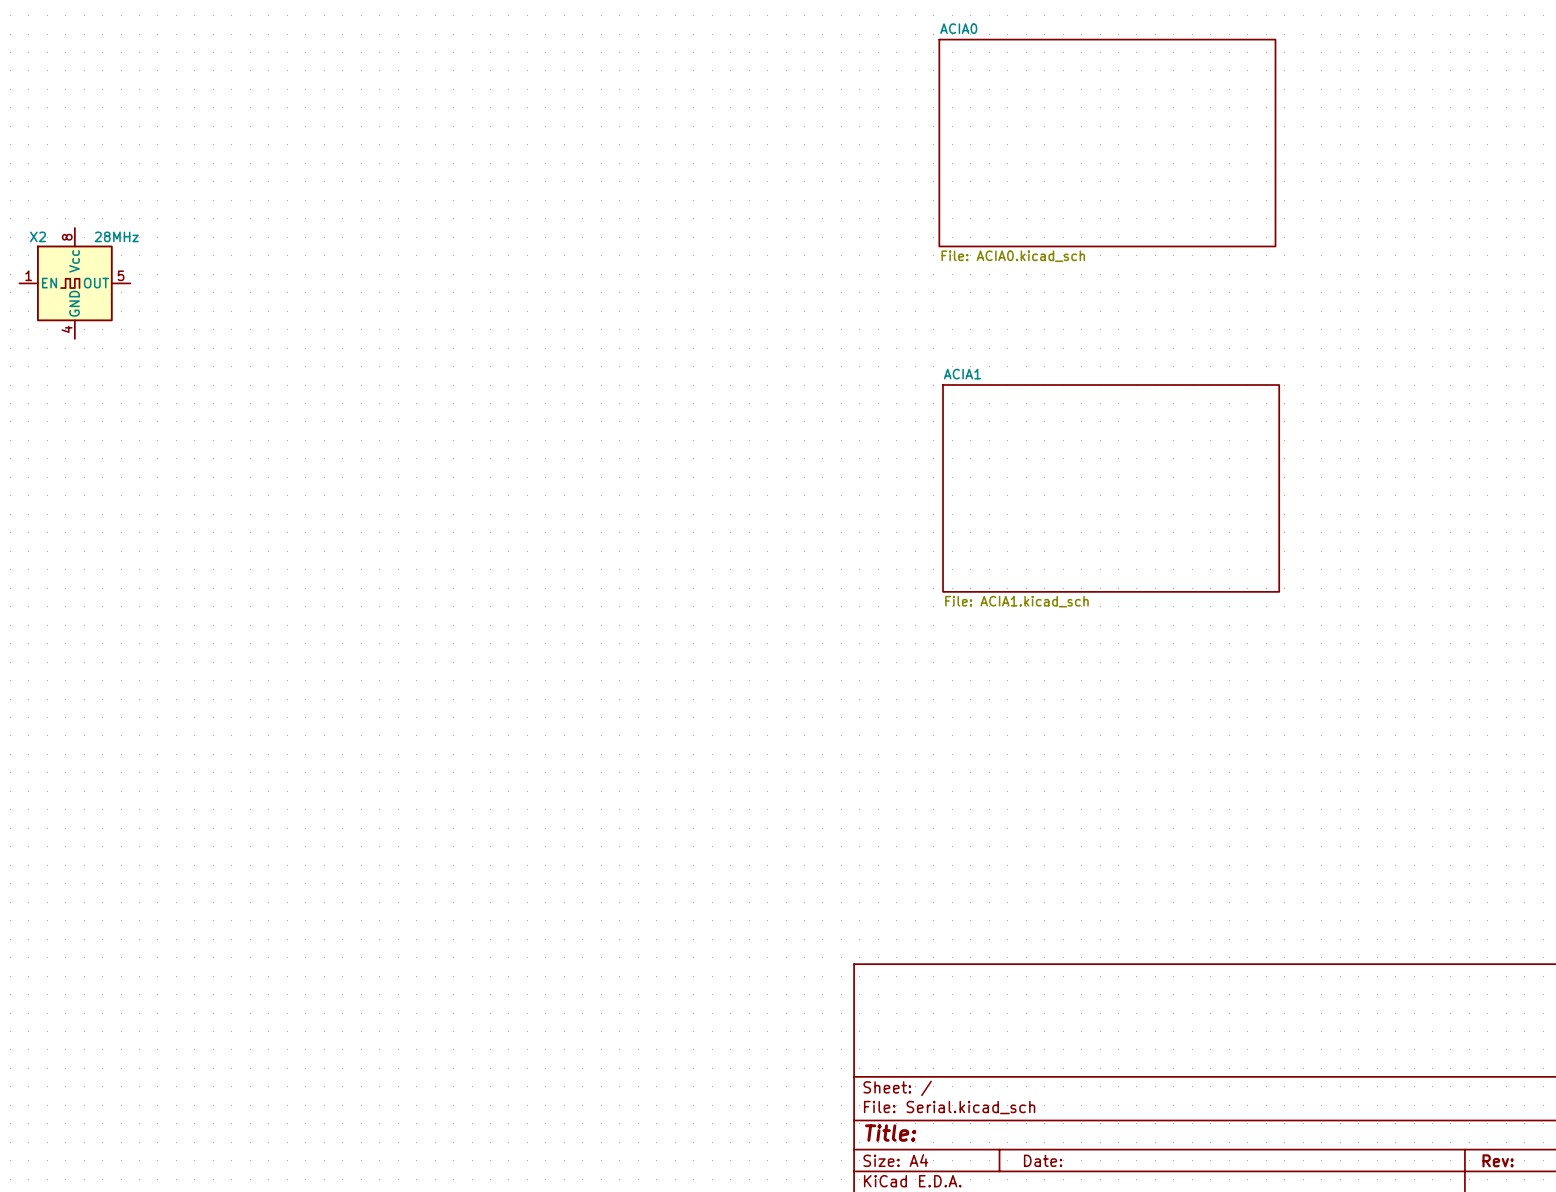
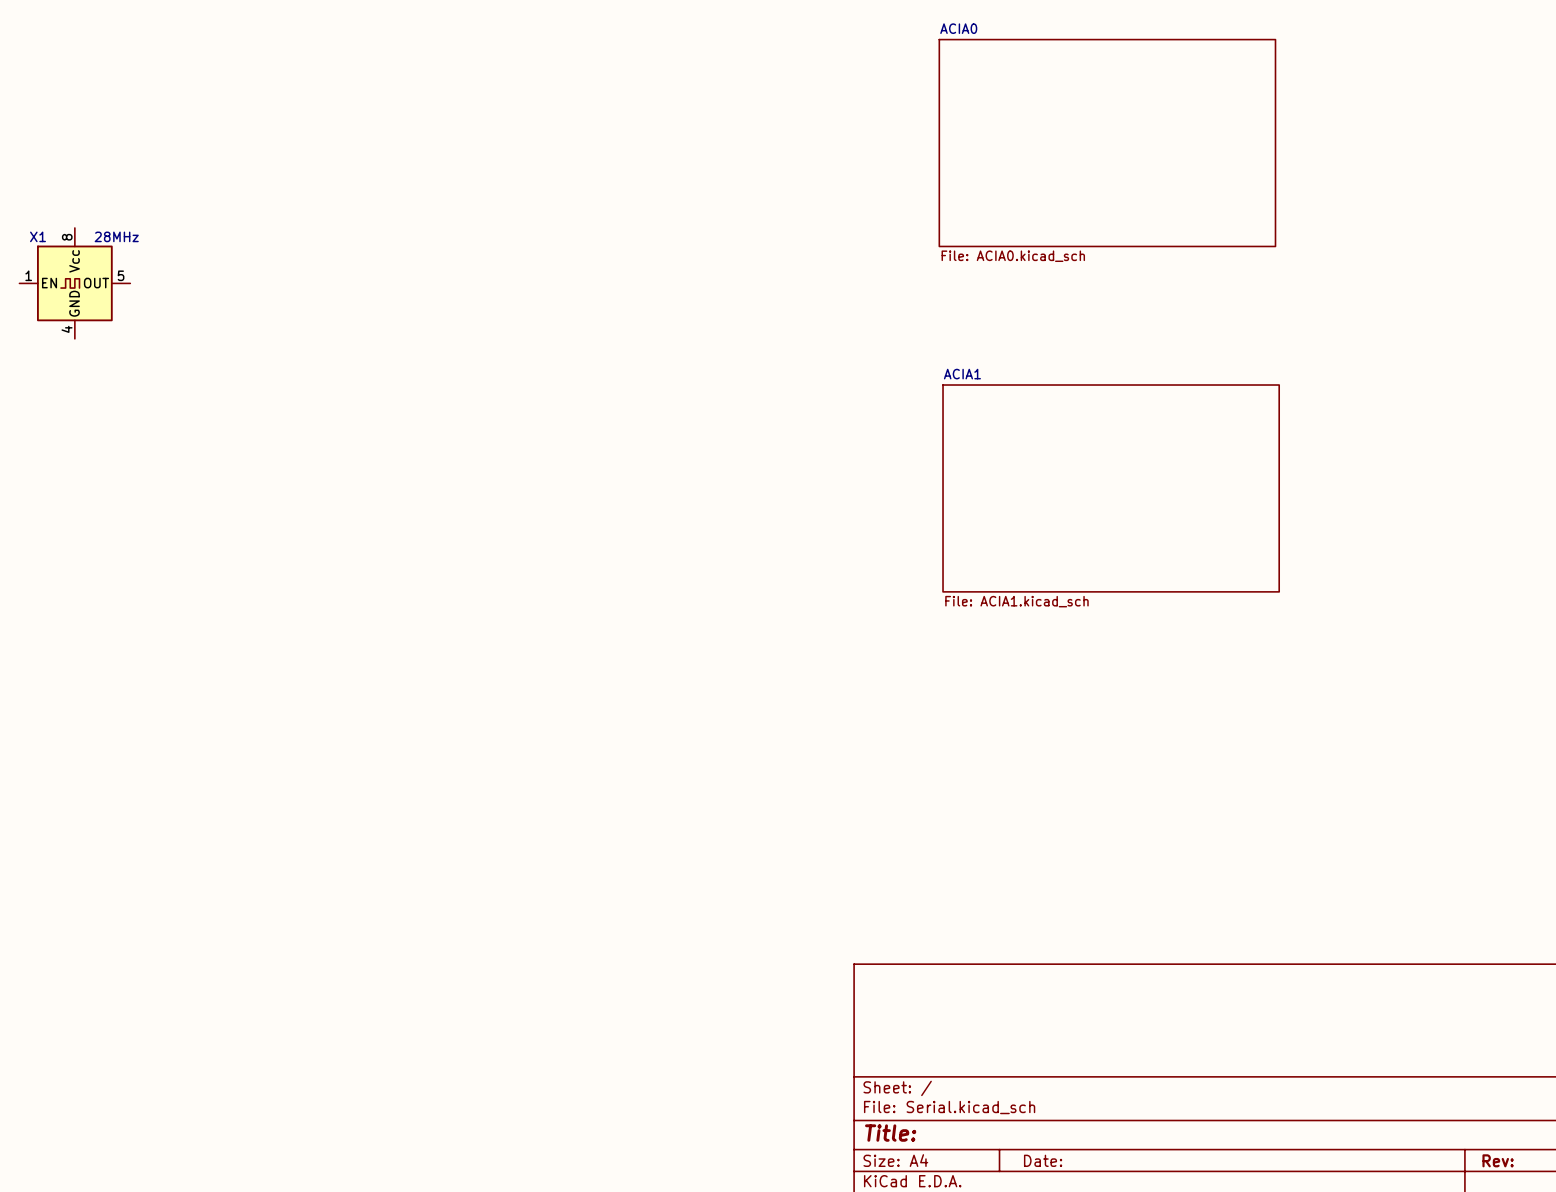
X2 name: X2 (38, 236) -> X1 (38, 236)

